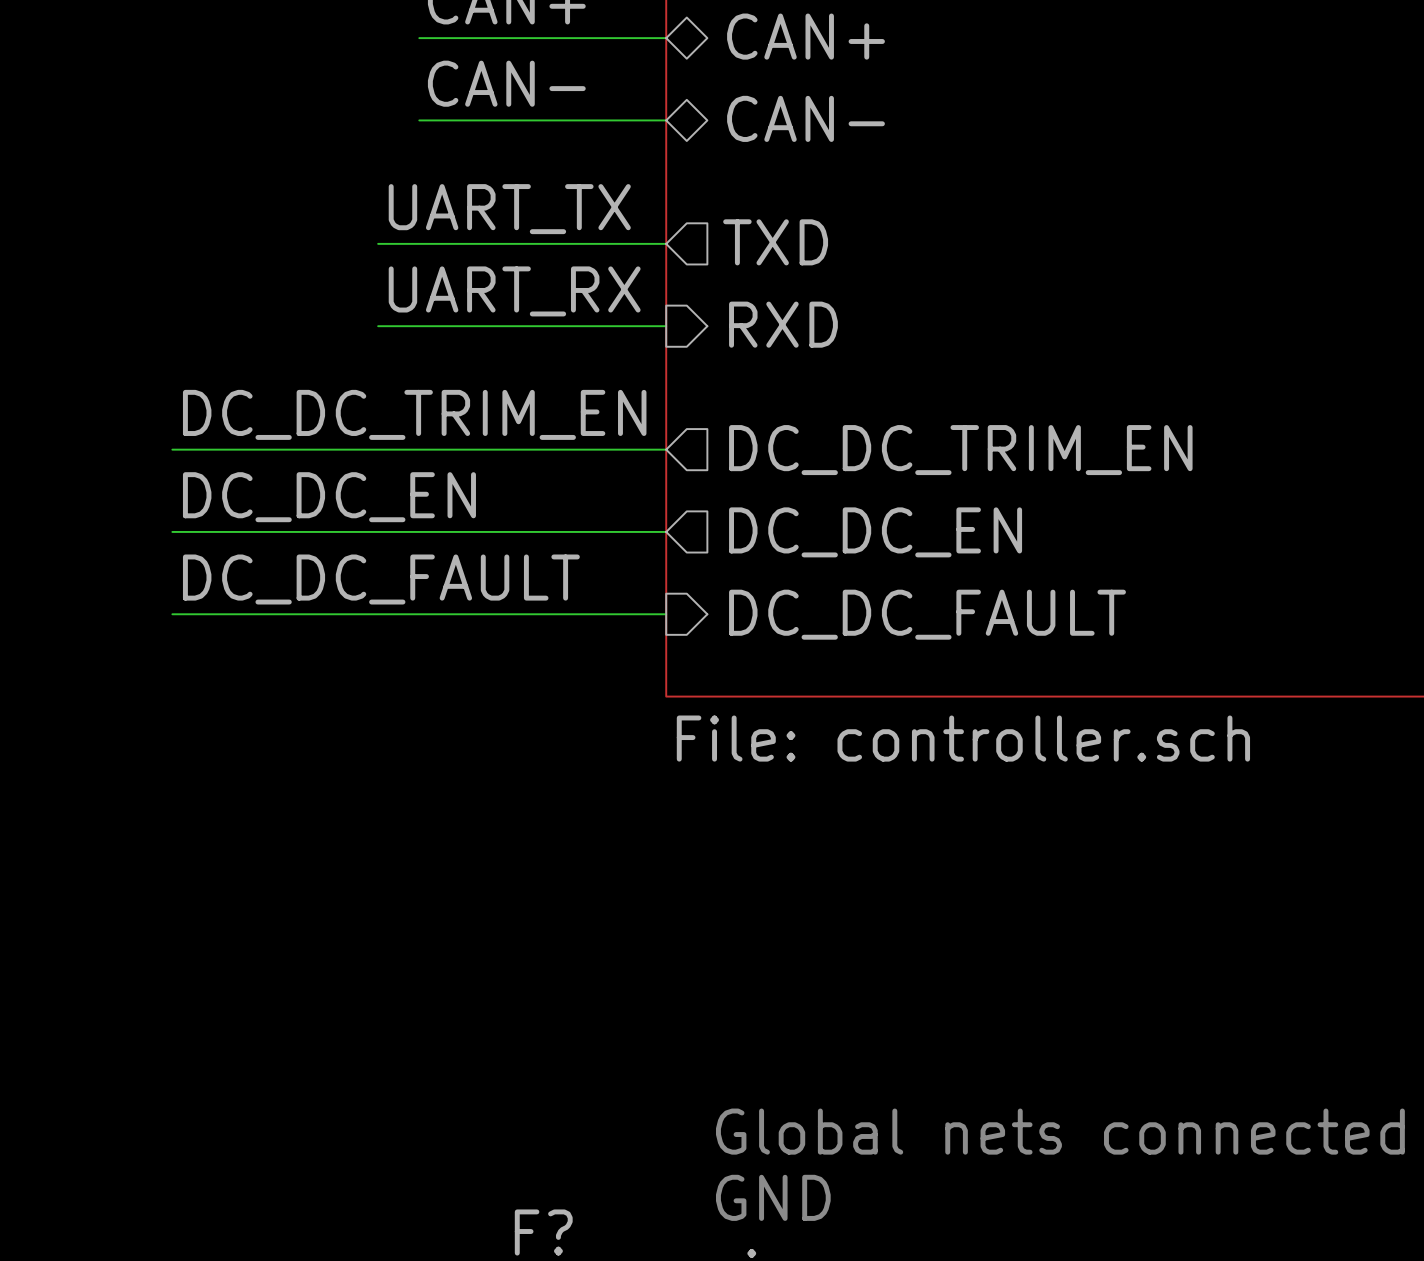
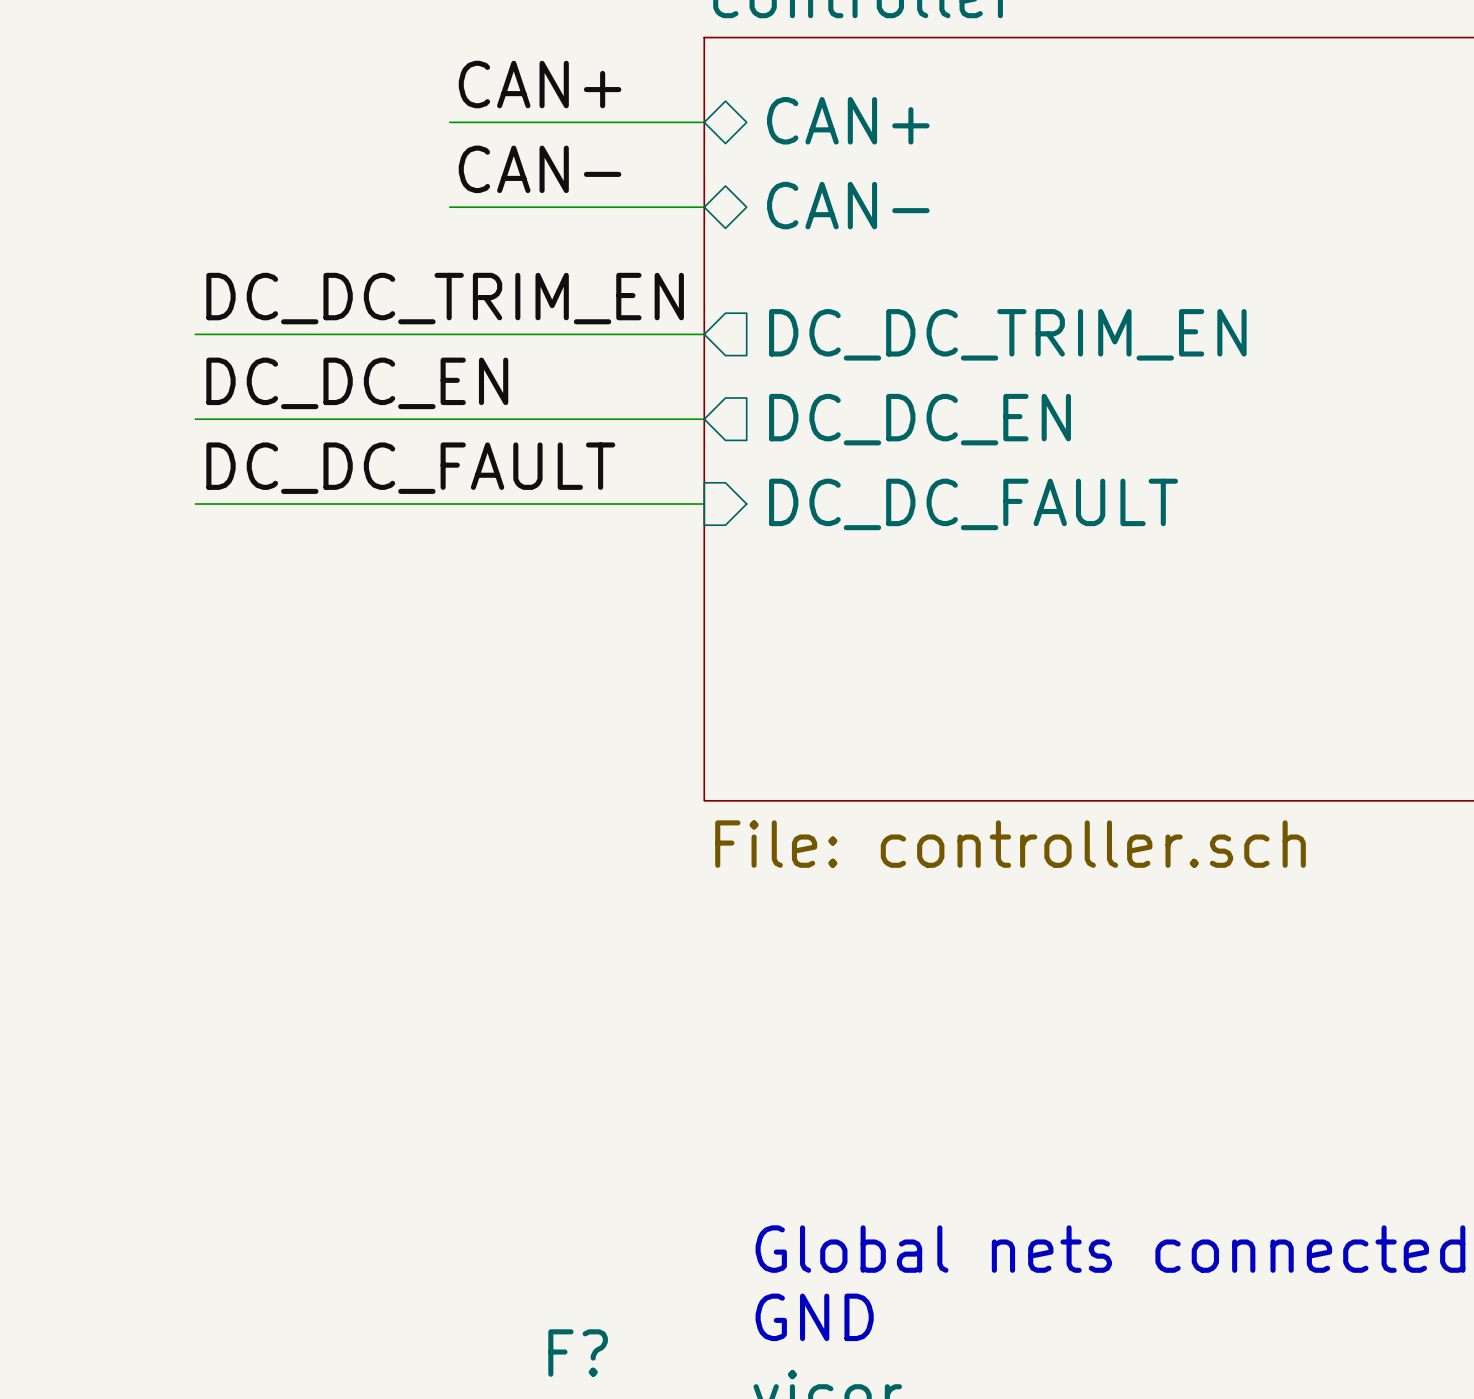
label: UART_TX (509, 209) -> none
sheet pin: TXD (775, 242) -> DC_DC_TRIM_EN (1007, 334)
wire: none -> (195, 334) (407, 334)
label: UART_RX (514, 291) -> none
sheet pin shape: input (783, 324) -> output (920, 419)
sheet pin: RXD (783, 324) -> DC_DC_EN (920, 419)
wire: none -> (195, 419) (407, 419)
label position: DC_DC_TRIM_EN (414, 414) -> DC_DC_TRIM_EN (445, 298)
wire: (172, 449) (666, 449) -> (195, 504) (704, 504)
sheet pin: DC_DC_TRIM_EN (960, 450) -> none
label position: DC_DC_EN (329, 497) -> DC_DC_EN (357, 383)
wire: (172, 531) (666, 531) -> none
sheet pin: DC_DC_EN (875, 532) -> none
label position: DC_DC_FAULT (381, 579) -> DC_DC_FAULT (410, 468)
wire: (172, 614) (666, 614) -> none
sheet pin position: DC_DC_FAULT (927, 614) -> DC_DC_FAULT (973, 504)

